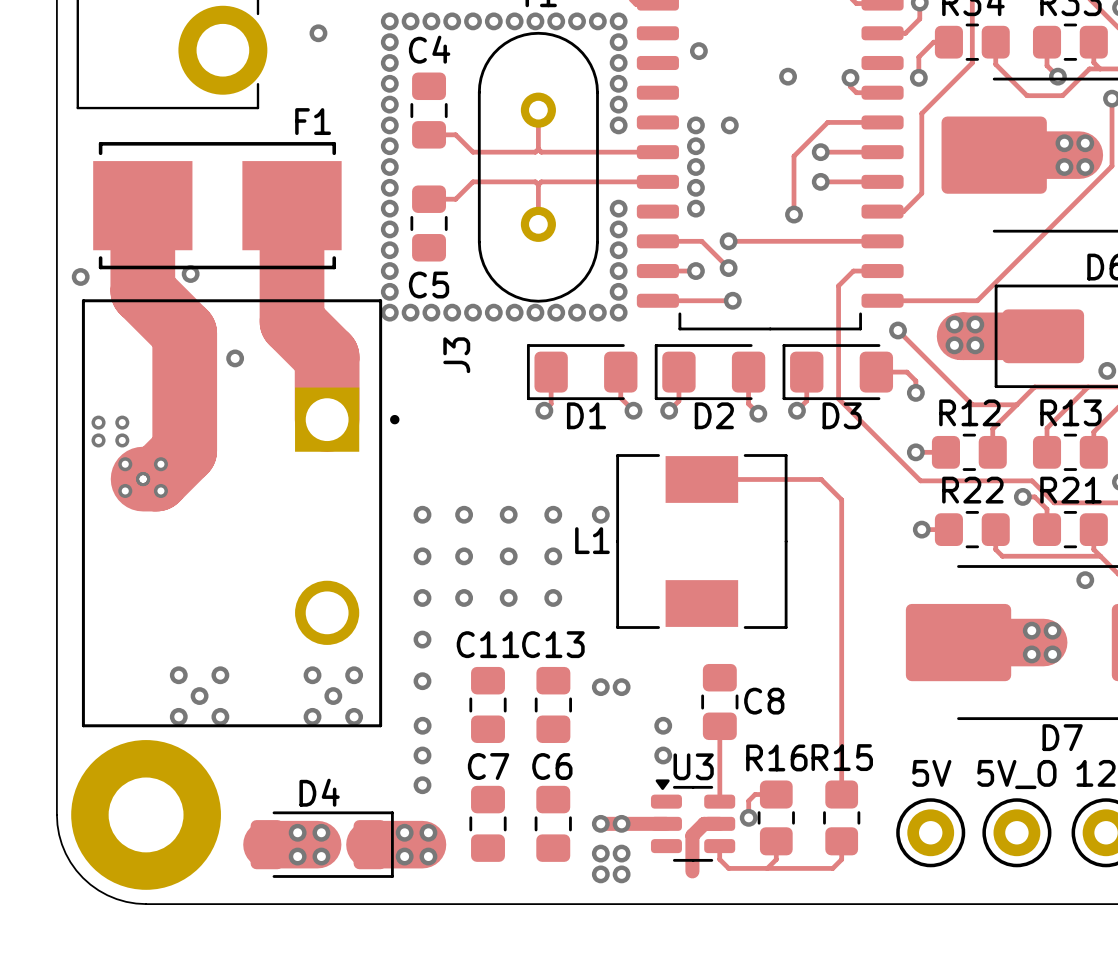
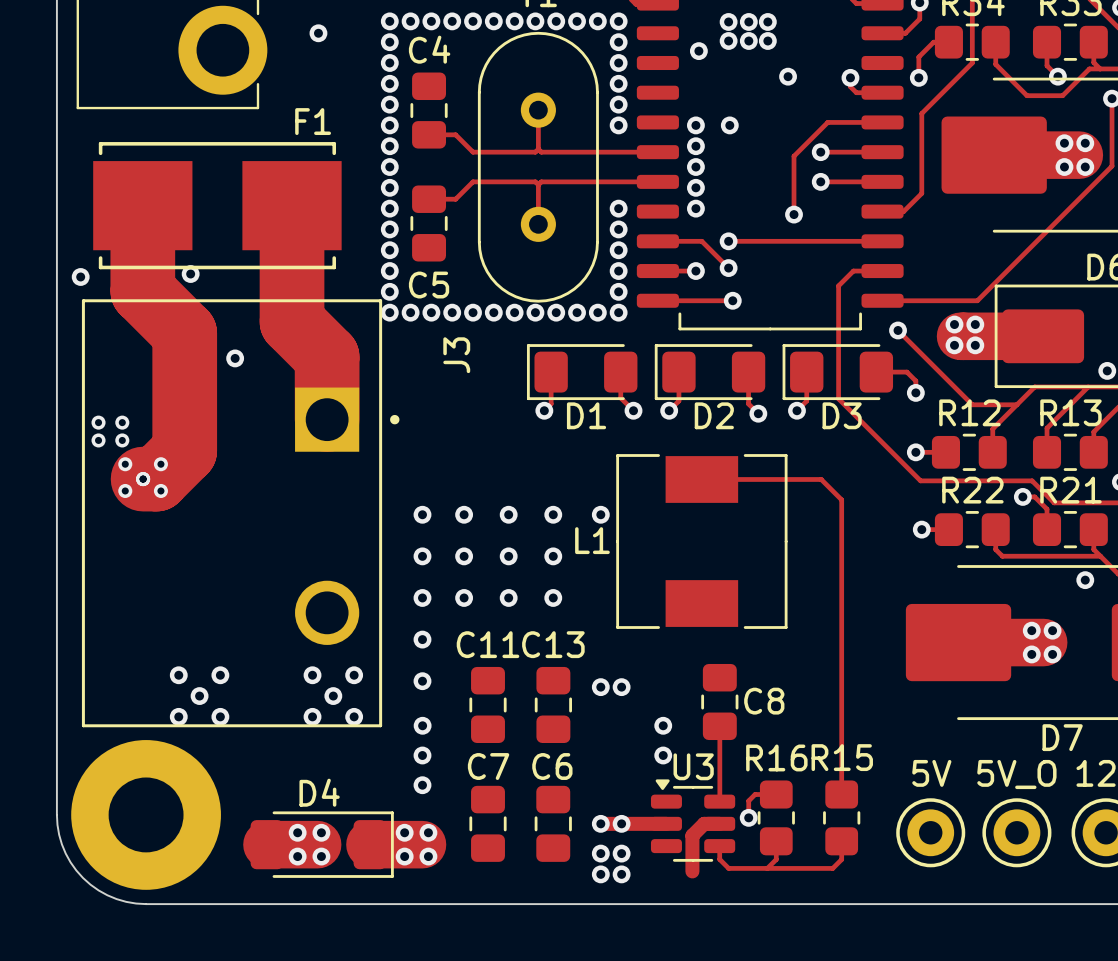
via: none -> (728, 21)
via: none -> (748, 21)
via: none -> (767, 21)
via: none -> (728, 41)
via: none -> (748, 41)
via: none -> (767, 41)

